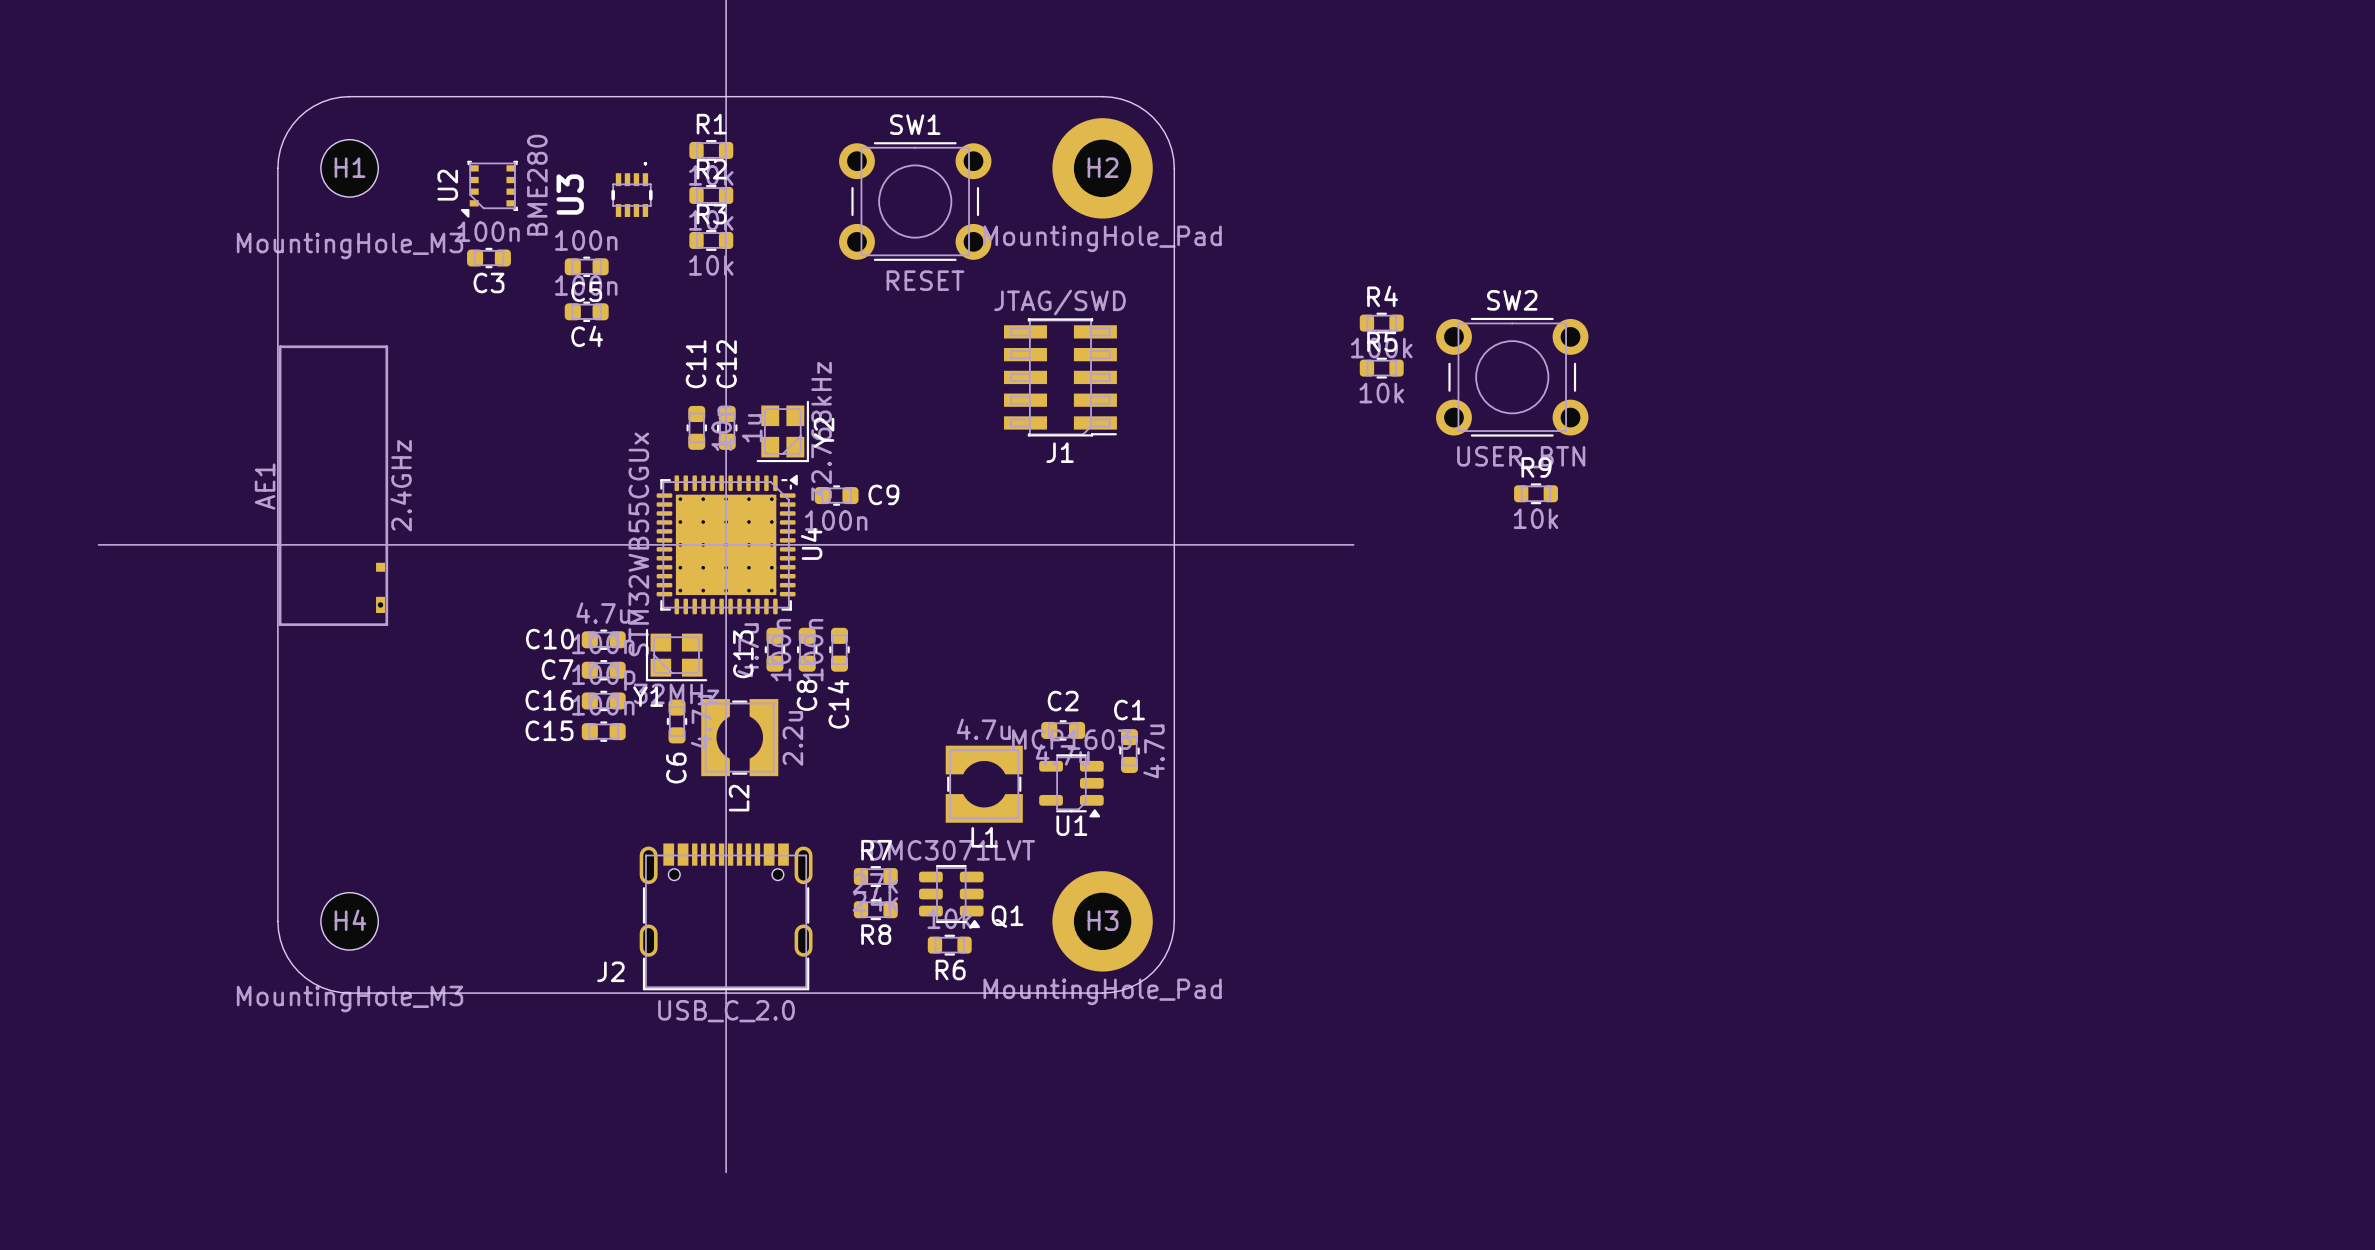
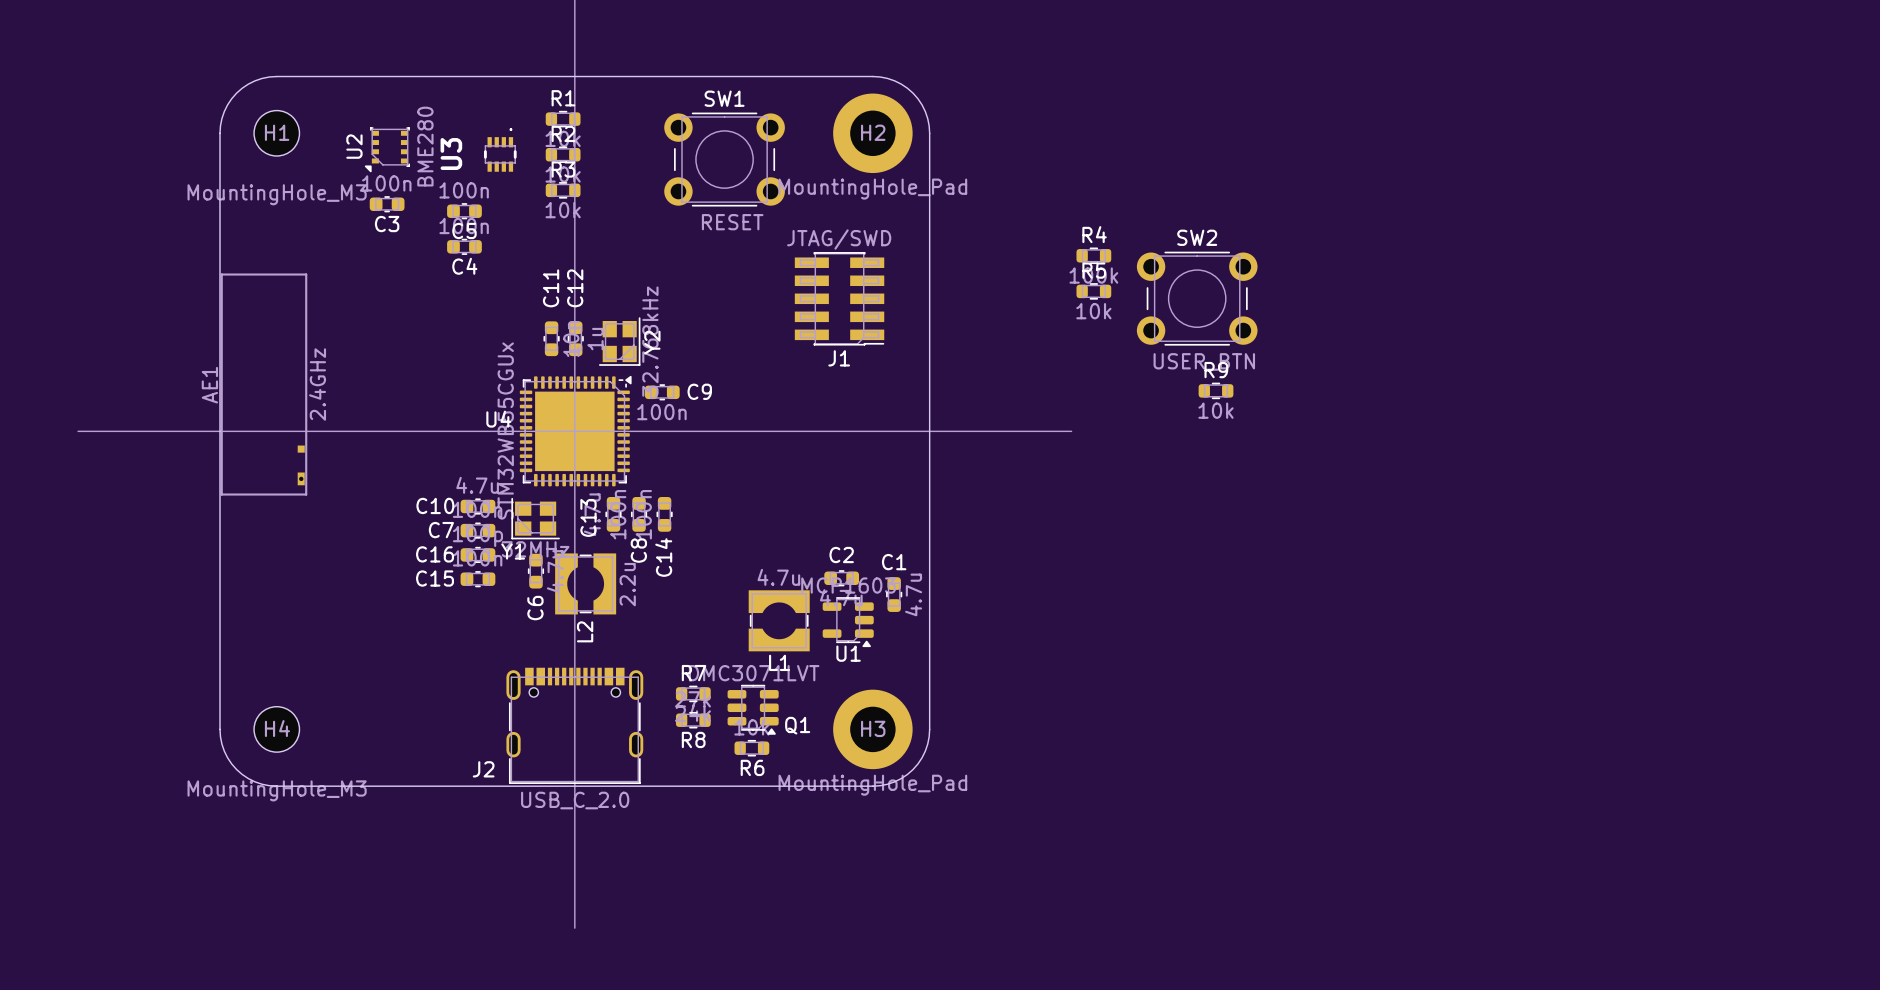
U4 footprint: [656, 474, 798, 615] -> [519, 375, 632, 487]
U4 name position: U4 (811, 544) -> U4 (498, 419)

